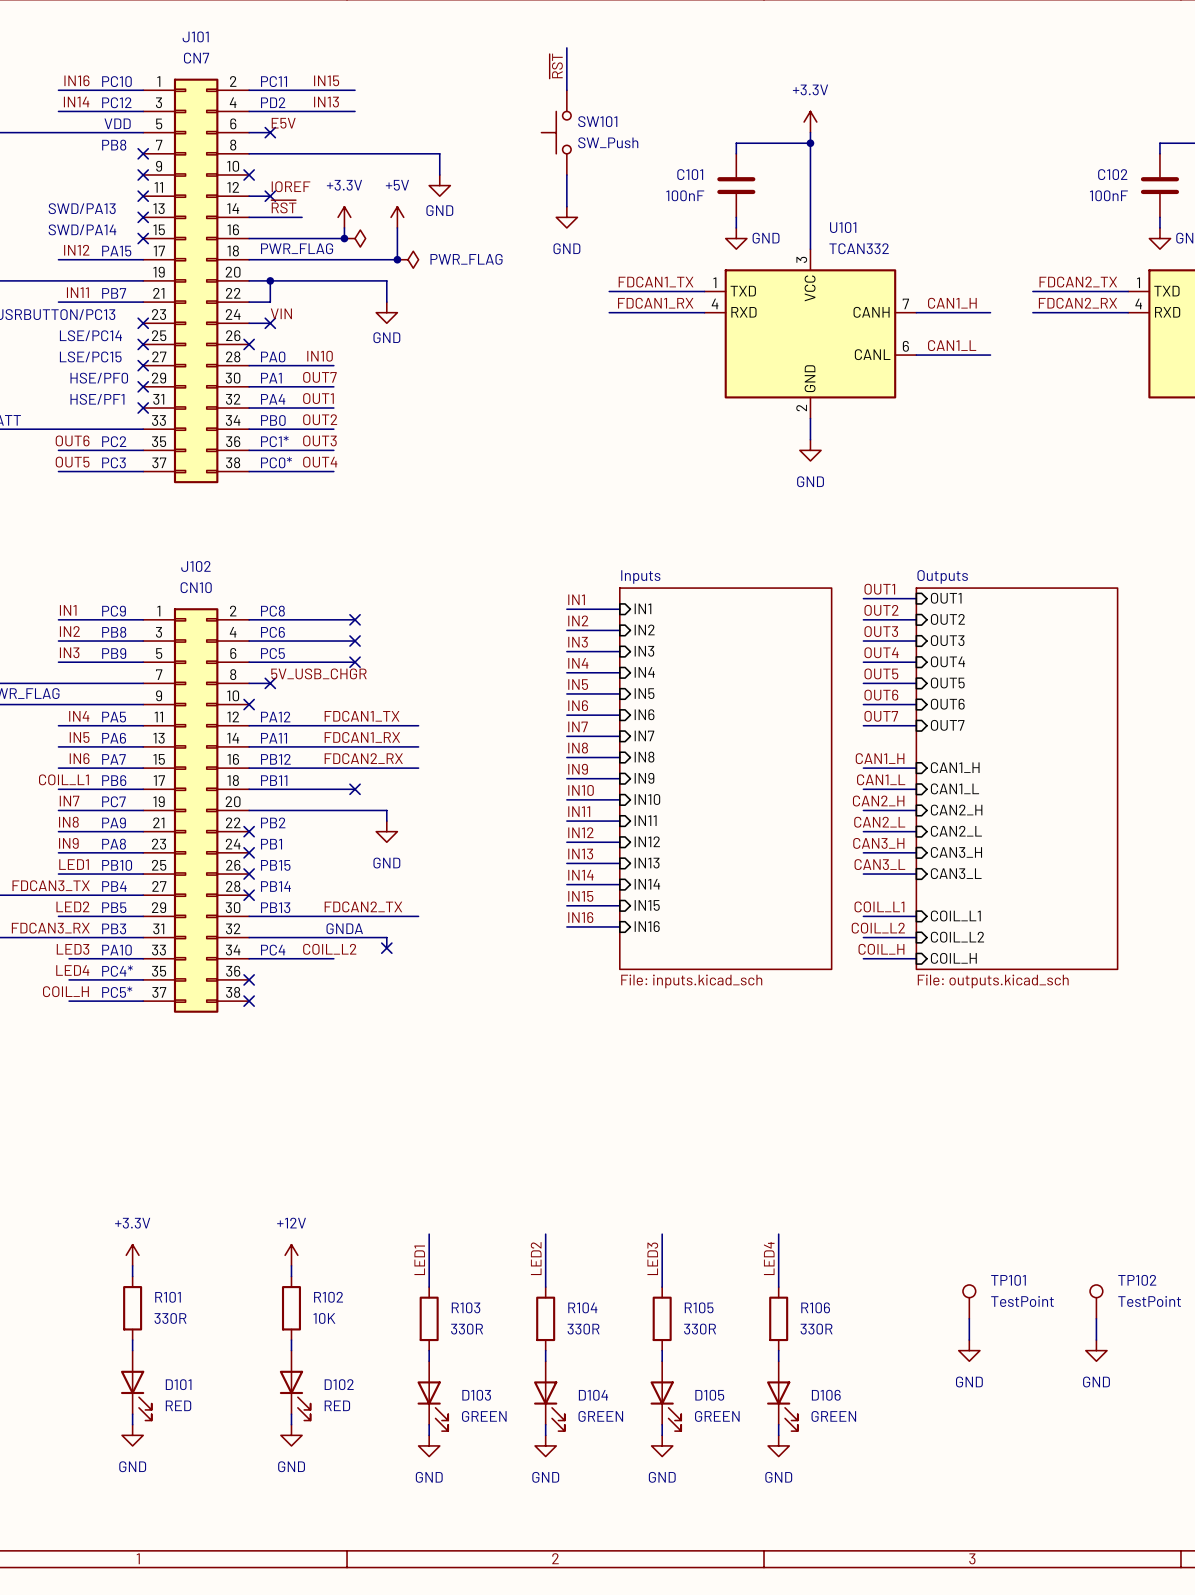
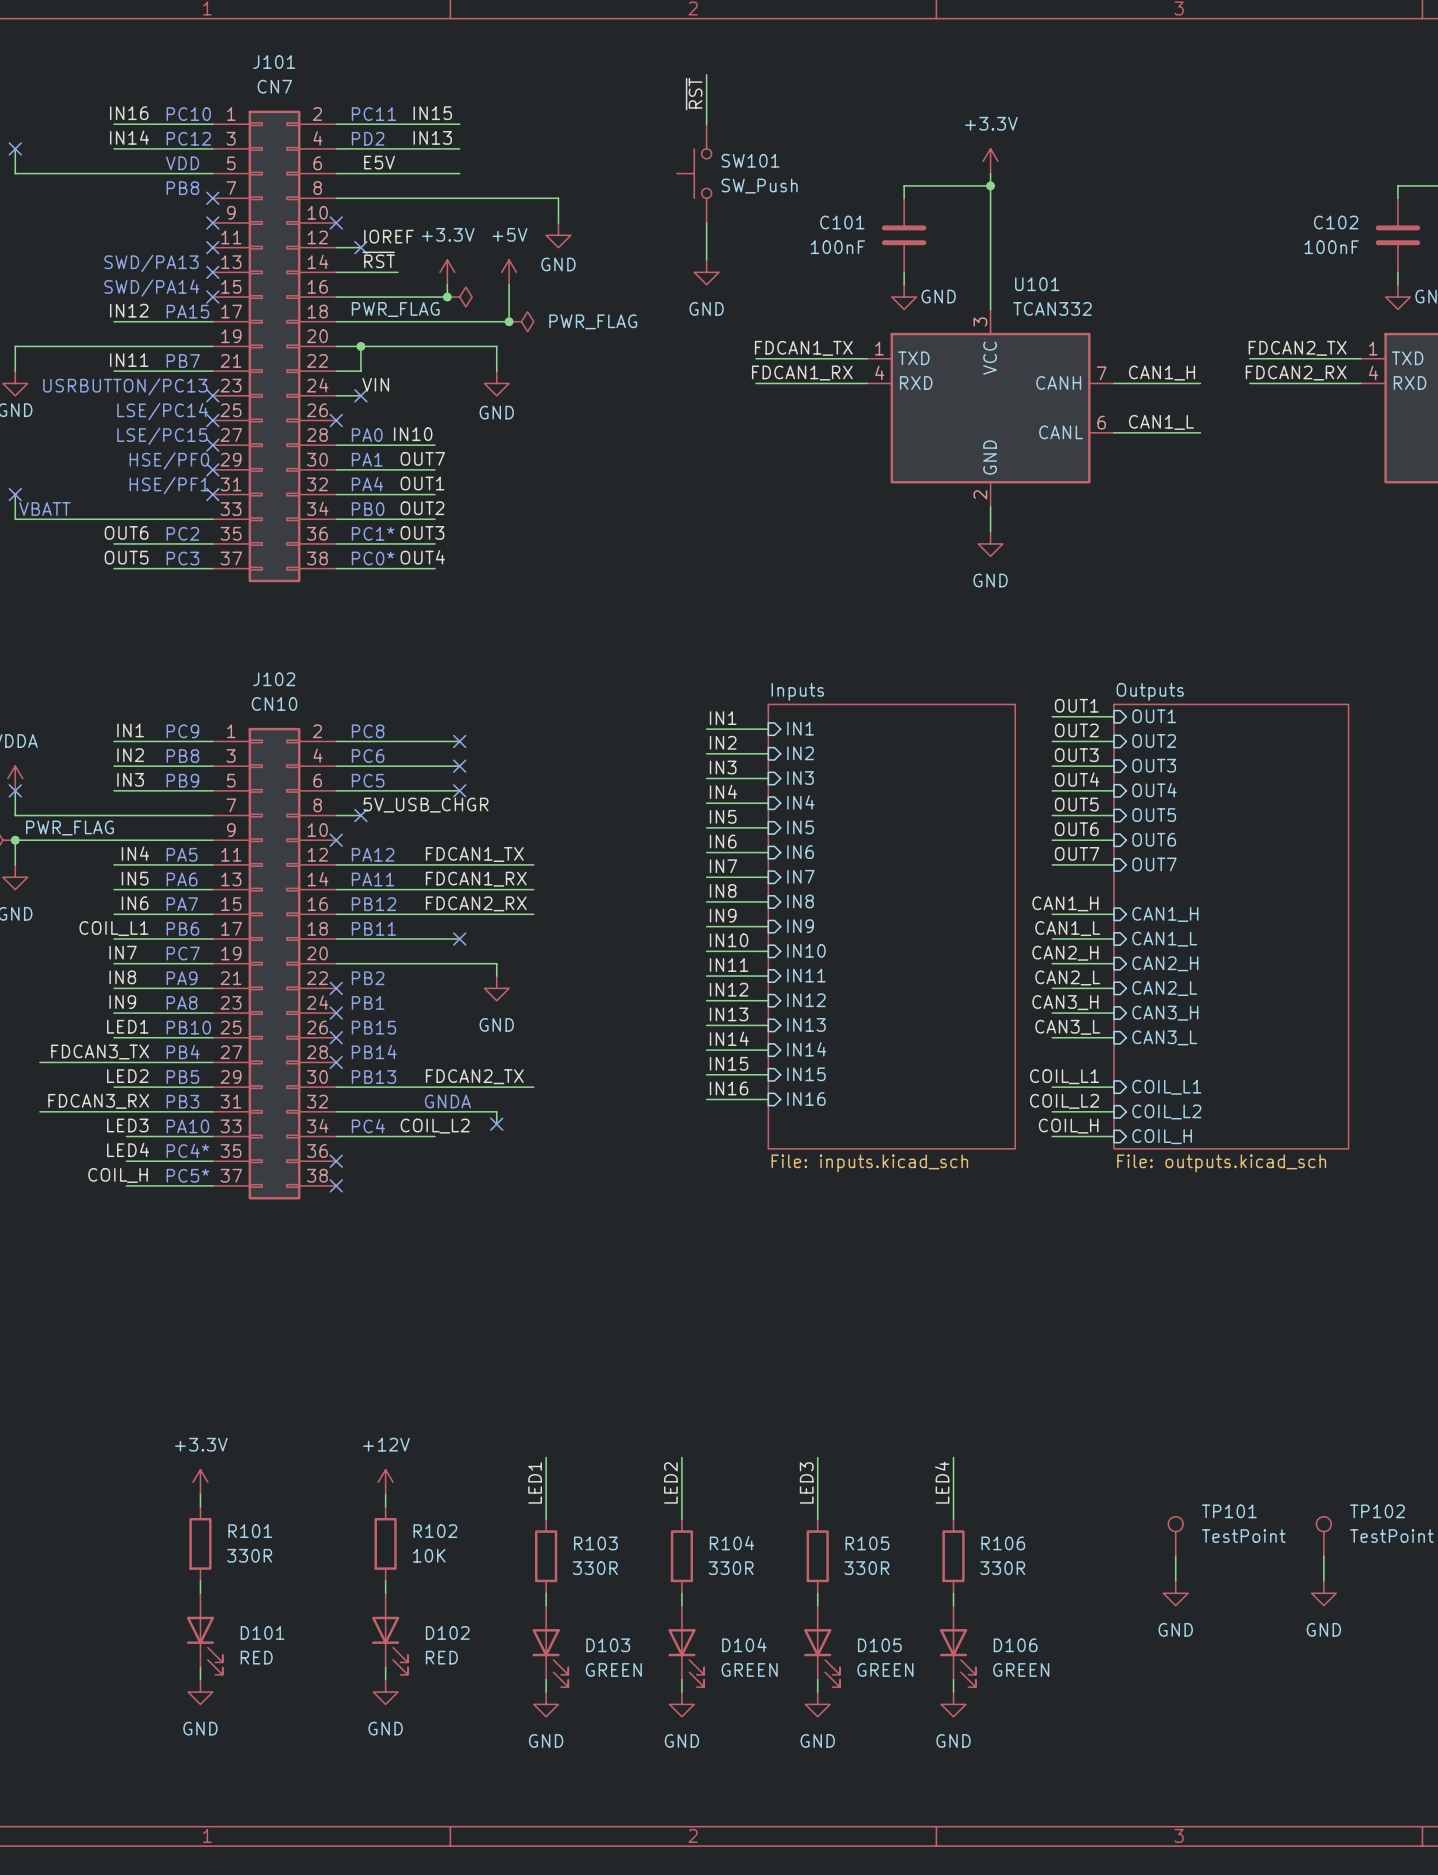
wire: none -> (360, 173) (459, 173)
no-connect mark: (270, 132) -> none

